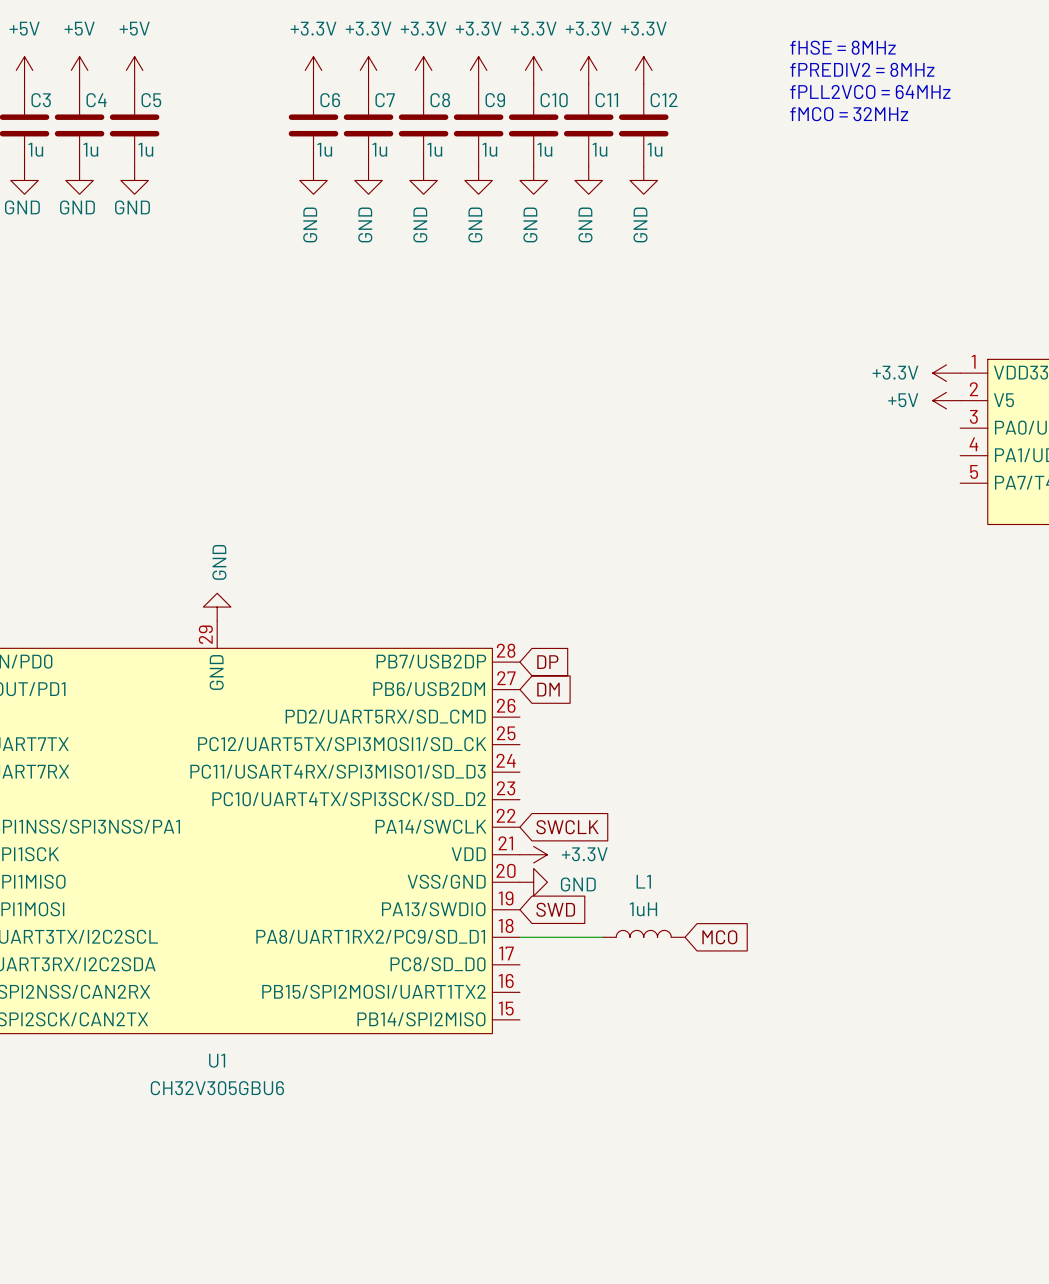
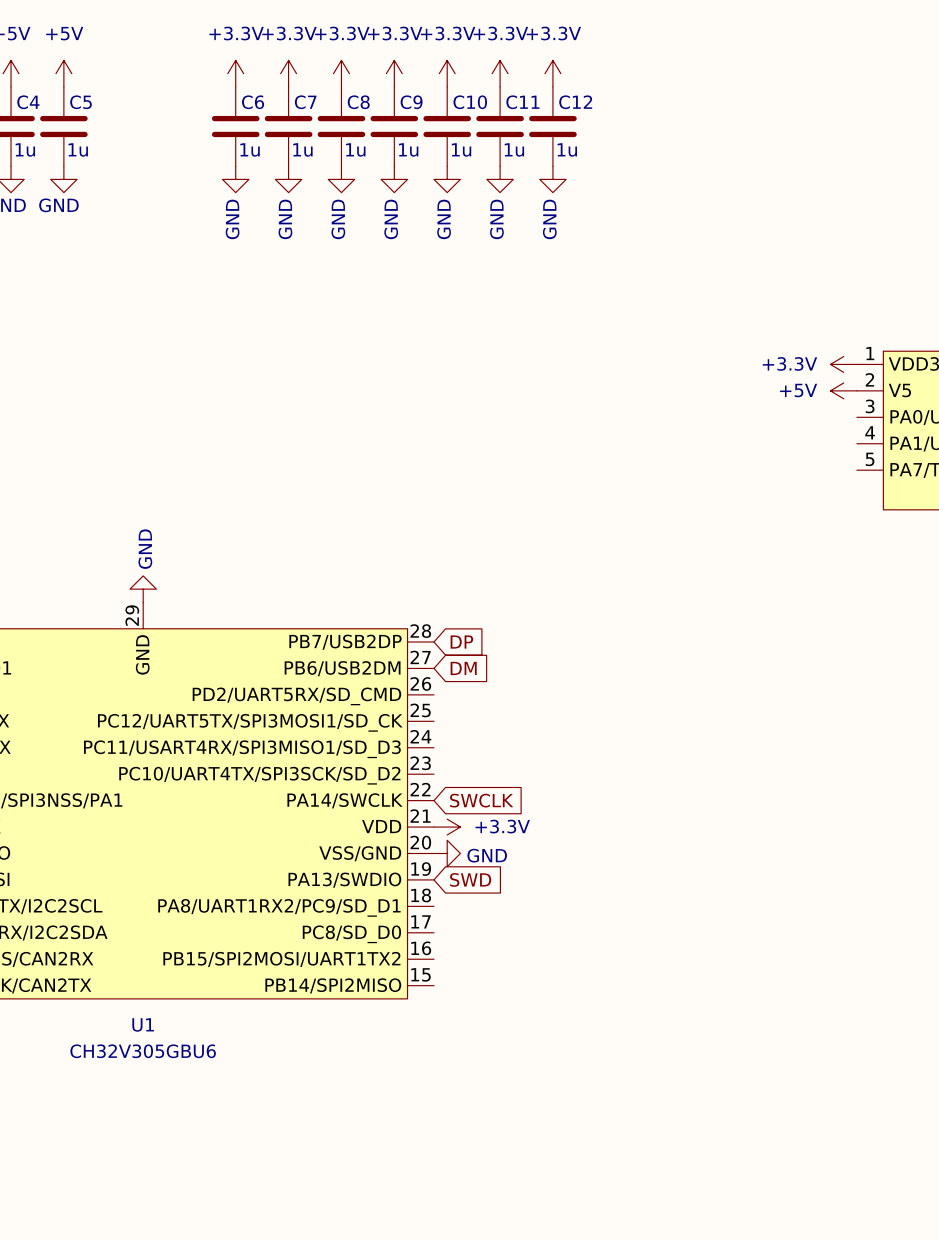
text: fHSE = 8MHz (843, 47) -> none
text: fPREDIV2 = 8MHz (862, 69) -> none
text: fPLL2VCO = 64MHz (870, 92) -> none
text: fMCO = 32MHz (849, 114) -> none
L1: 1uH (643, 933) -> none
wire: (519, 937) (602, 937) -> none
global label: MCO (719, 937) -> none

